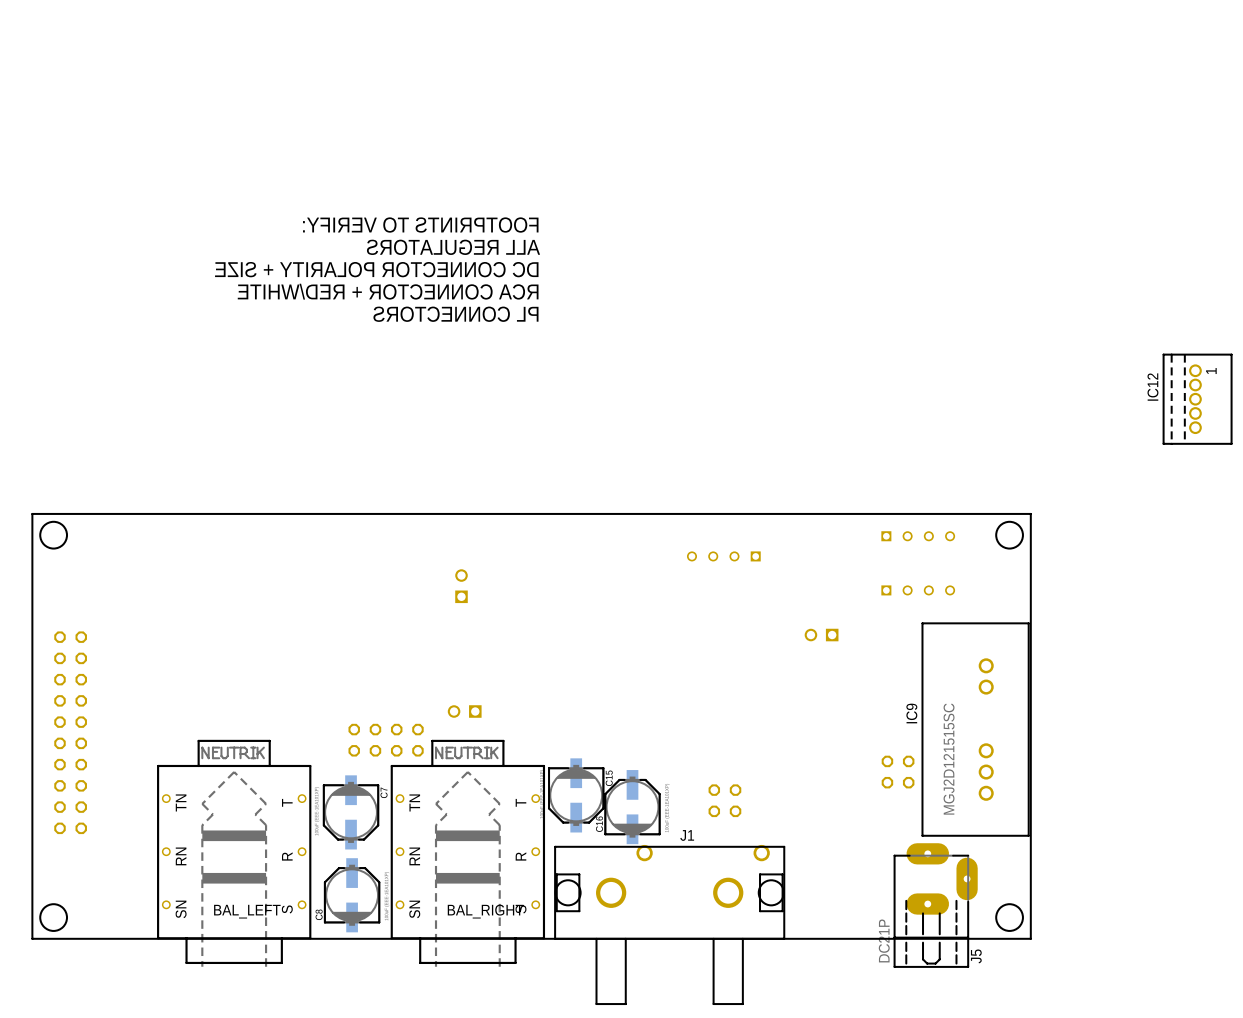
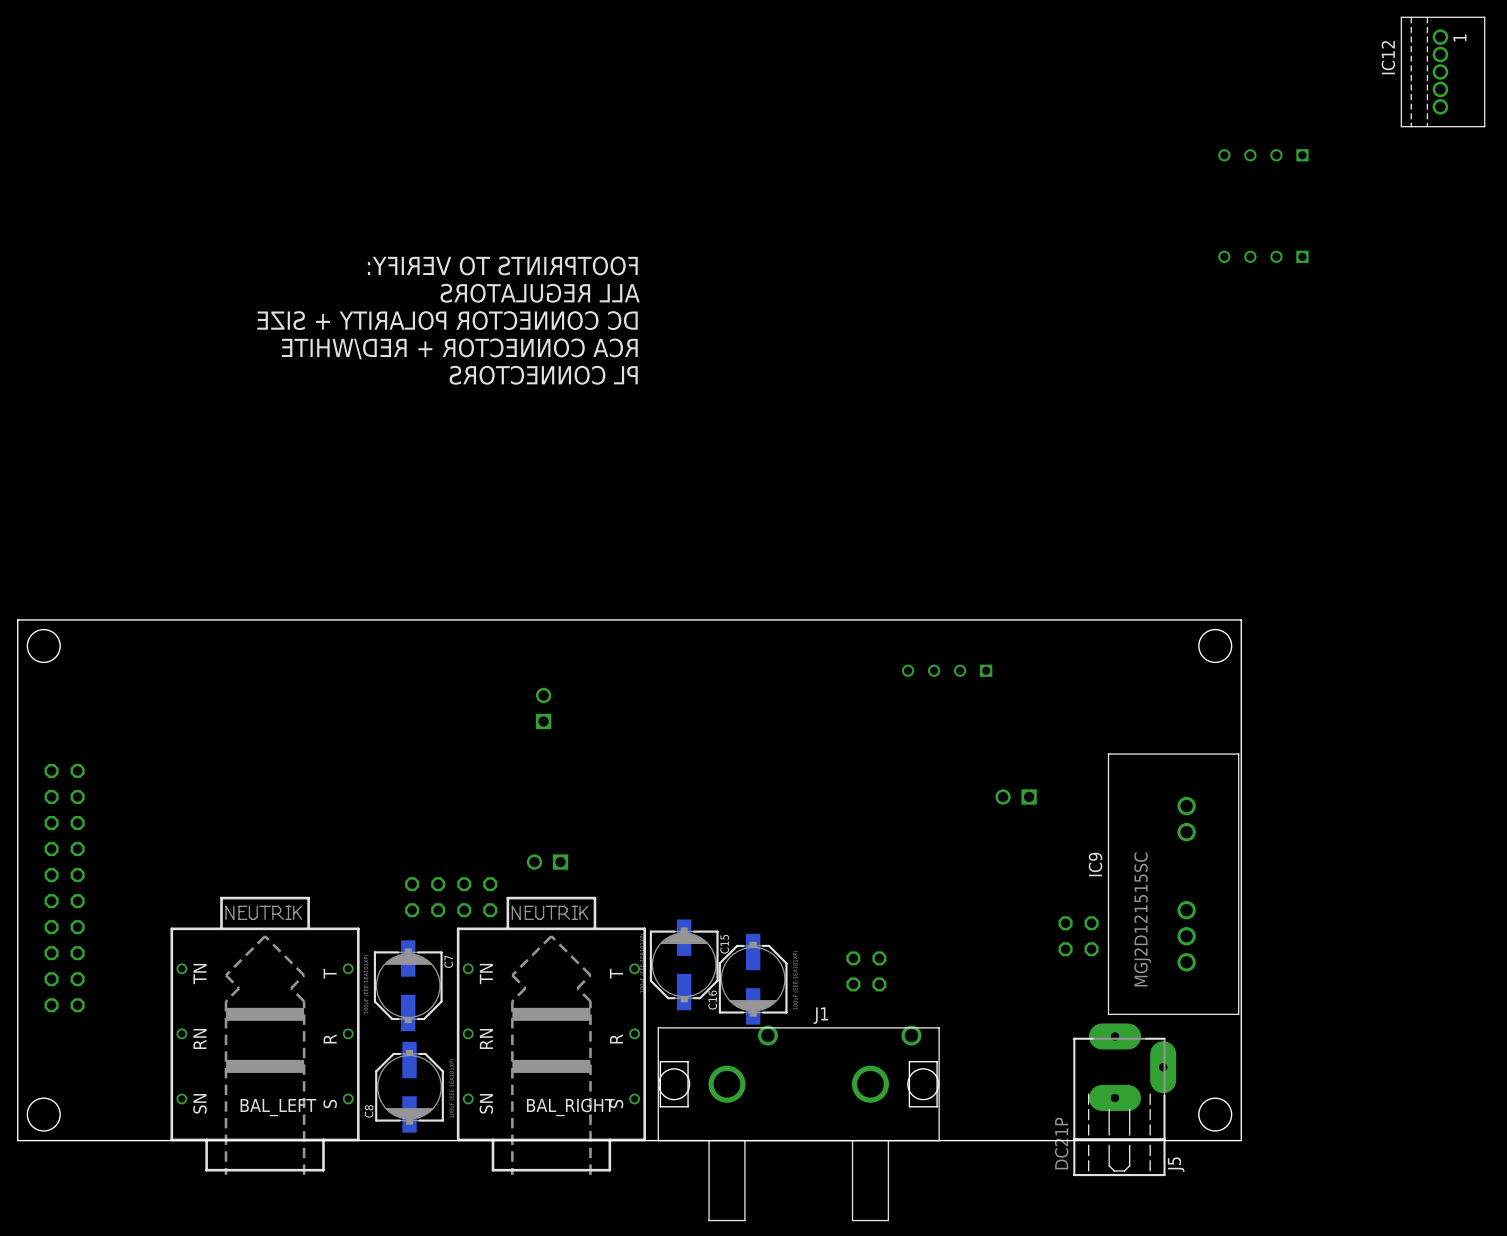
part: none -> (1263, 155)
part: none -> (1263, 256)
IC12 position: (1197, 399) -> (1443, 71)
part: (918, 536) -> none
part: none -> (947, 670)
part: (723, 556) -> none
part: (918, 590) -> none
part position: (821, 635) -> (1016, 796)

